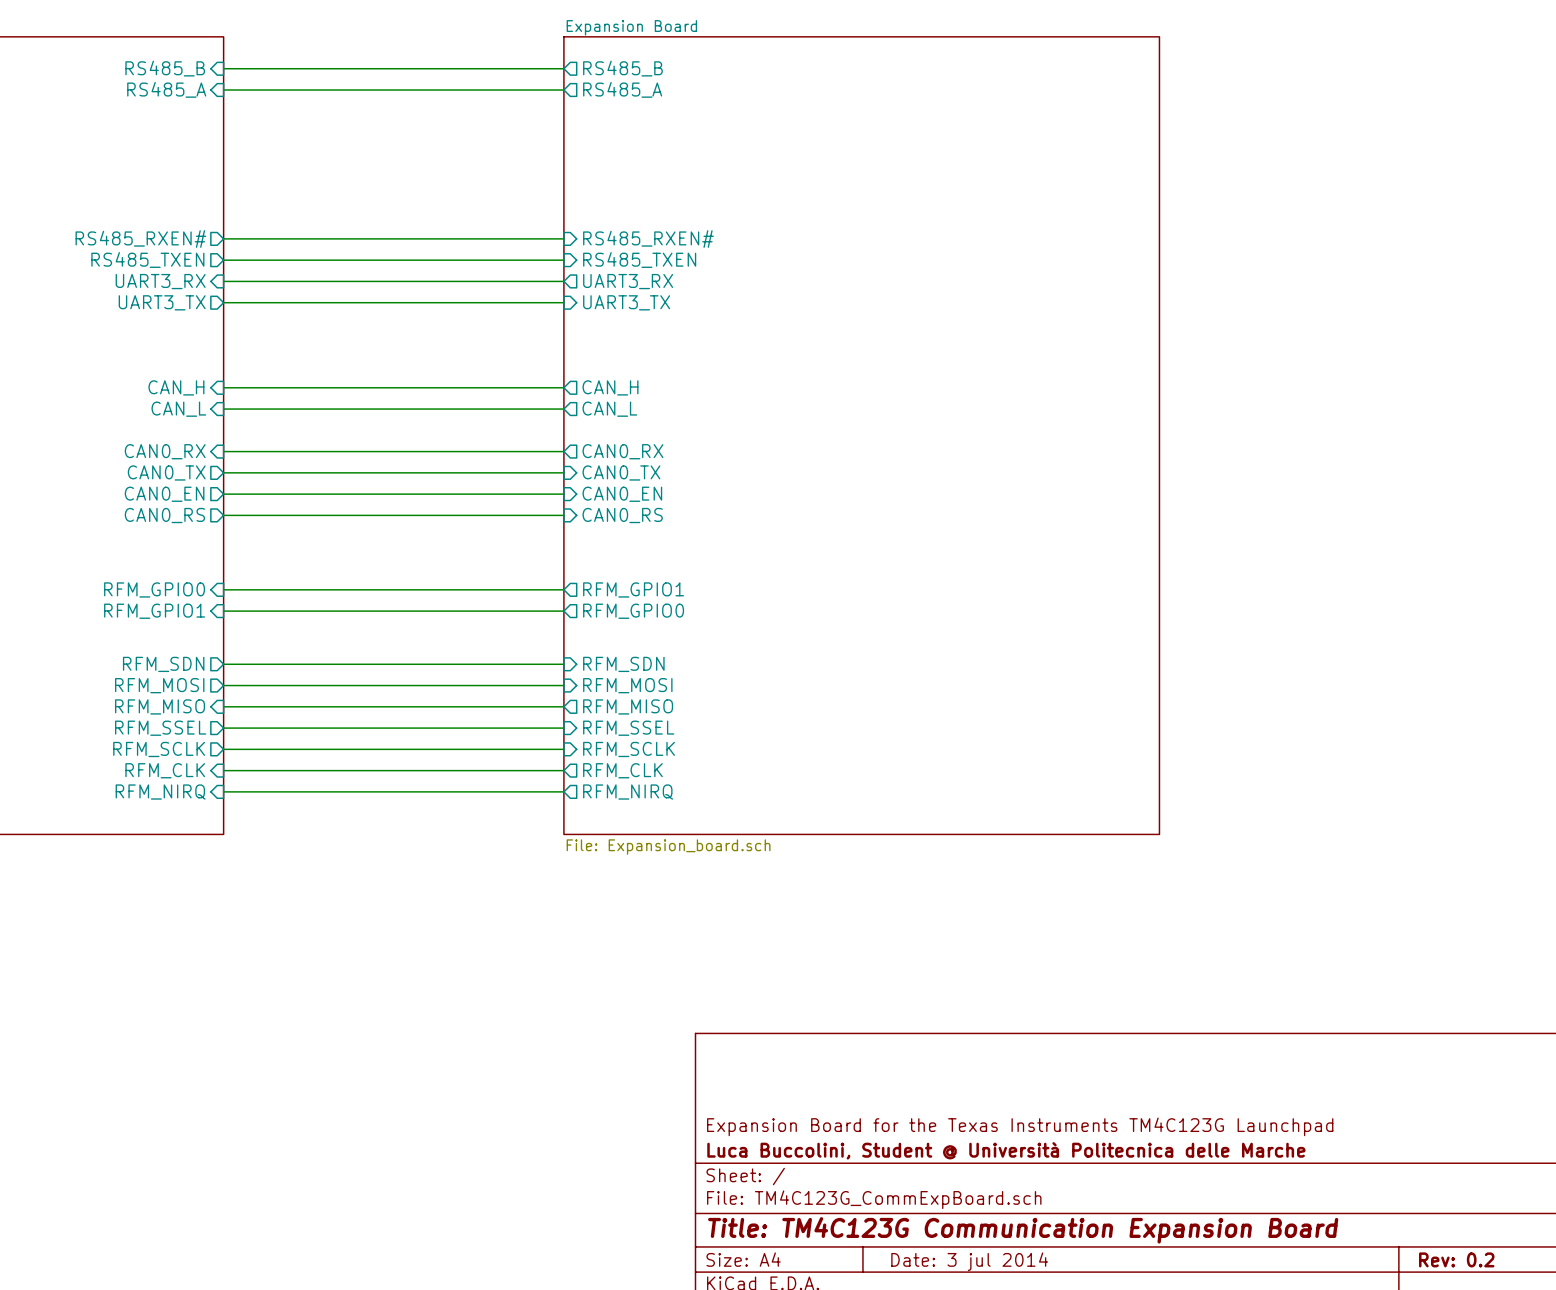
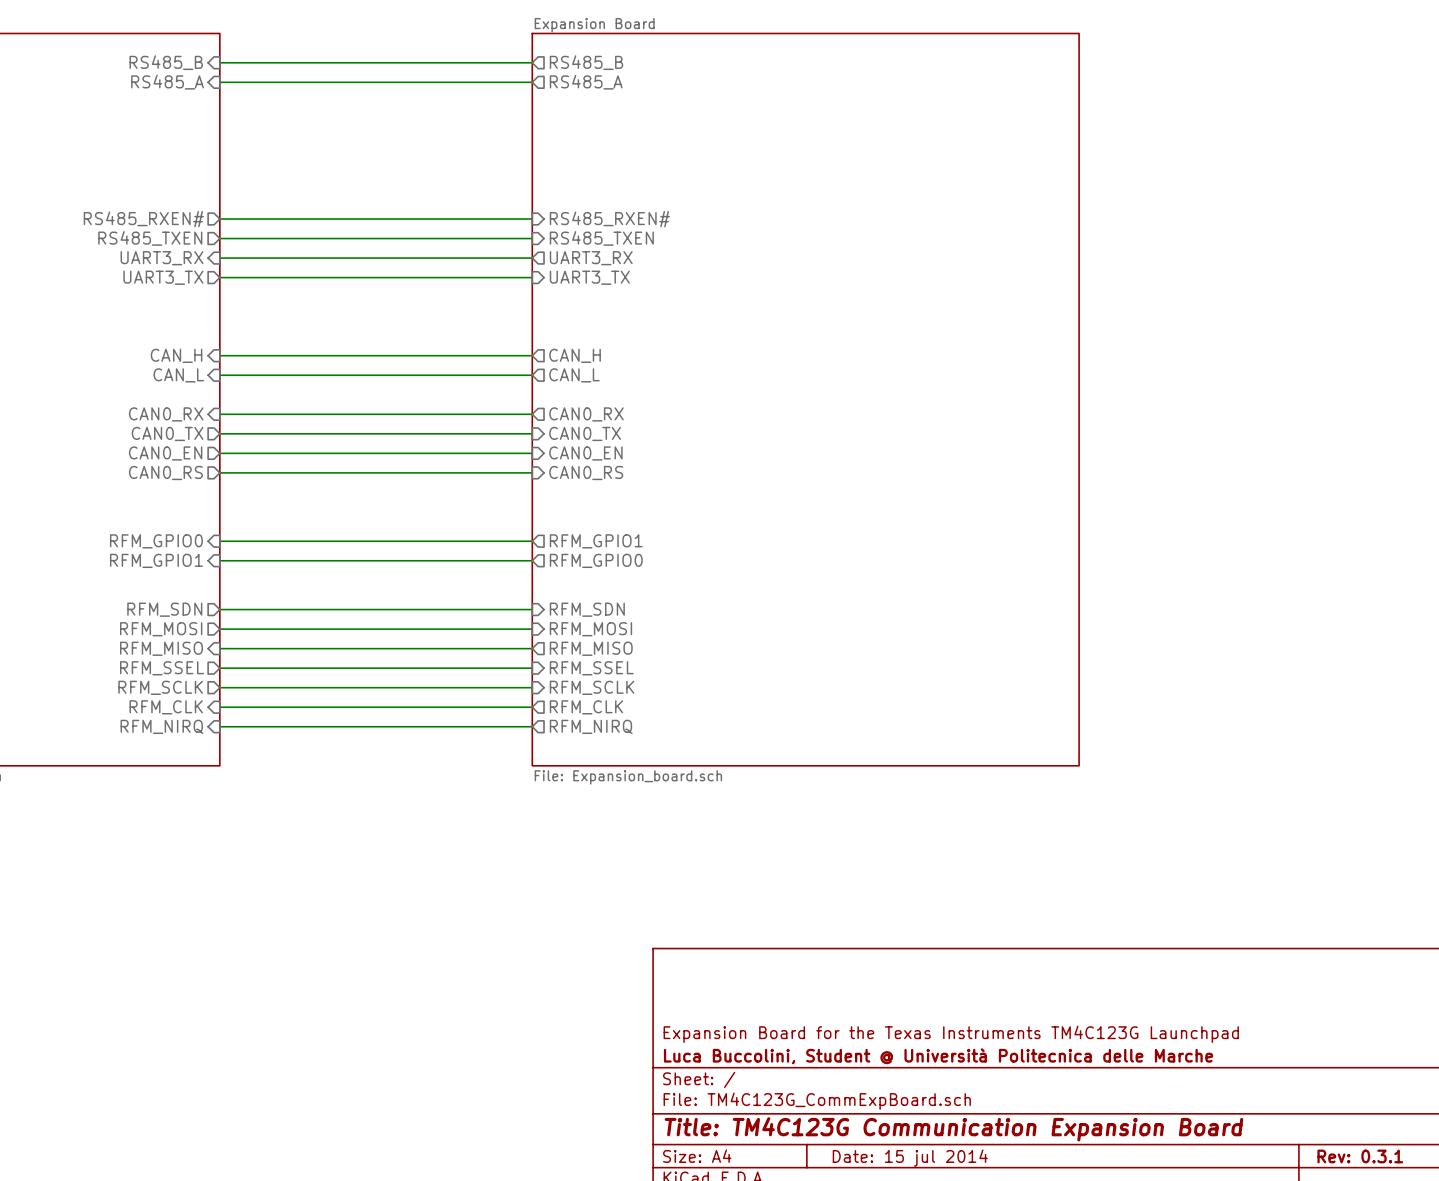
title block: Rev: 0.2 (1456, 1259) -> Rev: 0.3.1 (1360, 1156)
title block: Date: 3 jul 2014 (969, 1261) -> Date: 15 jul 2014 (910, 1158)

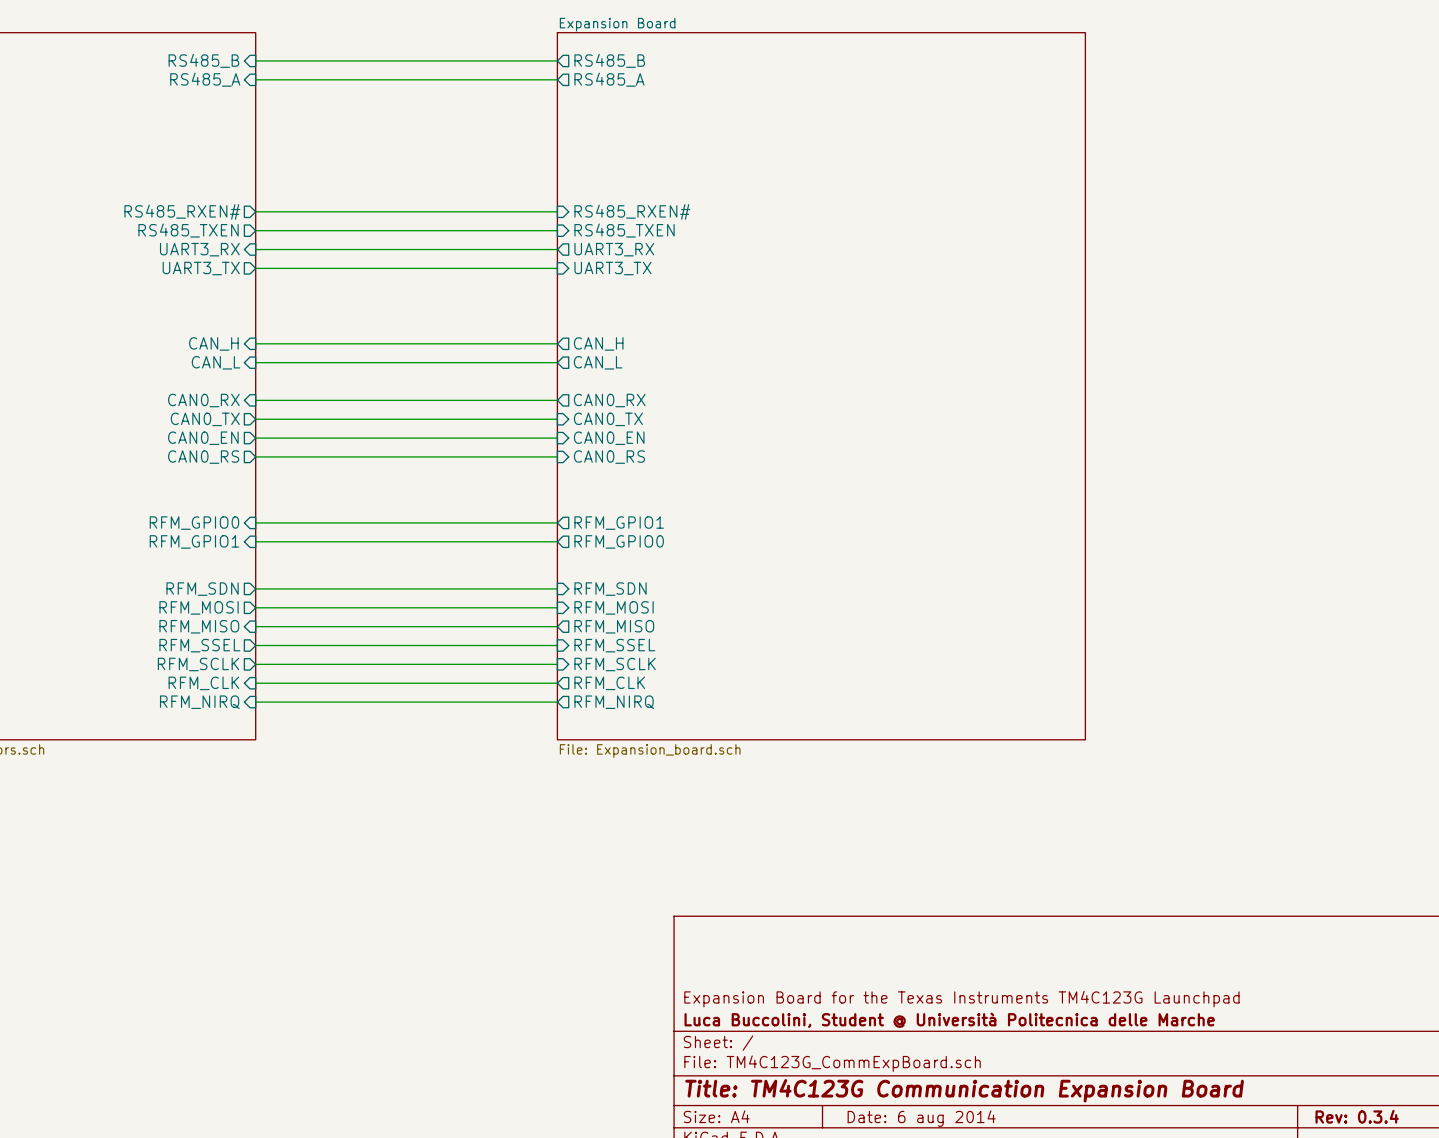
title block: Rev: 0.3.1 (1360, 1156) -> Rev: 0.3.4 (1357, 1116)
title block: Date: 15 jul 2014 (910, 1158) -> Date: 6 aug 2014 (921, 1118)

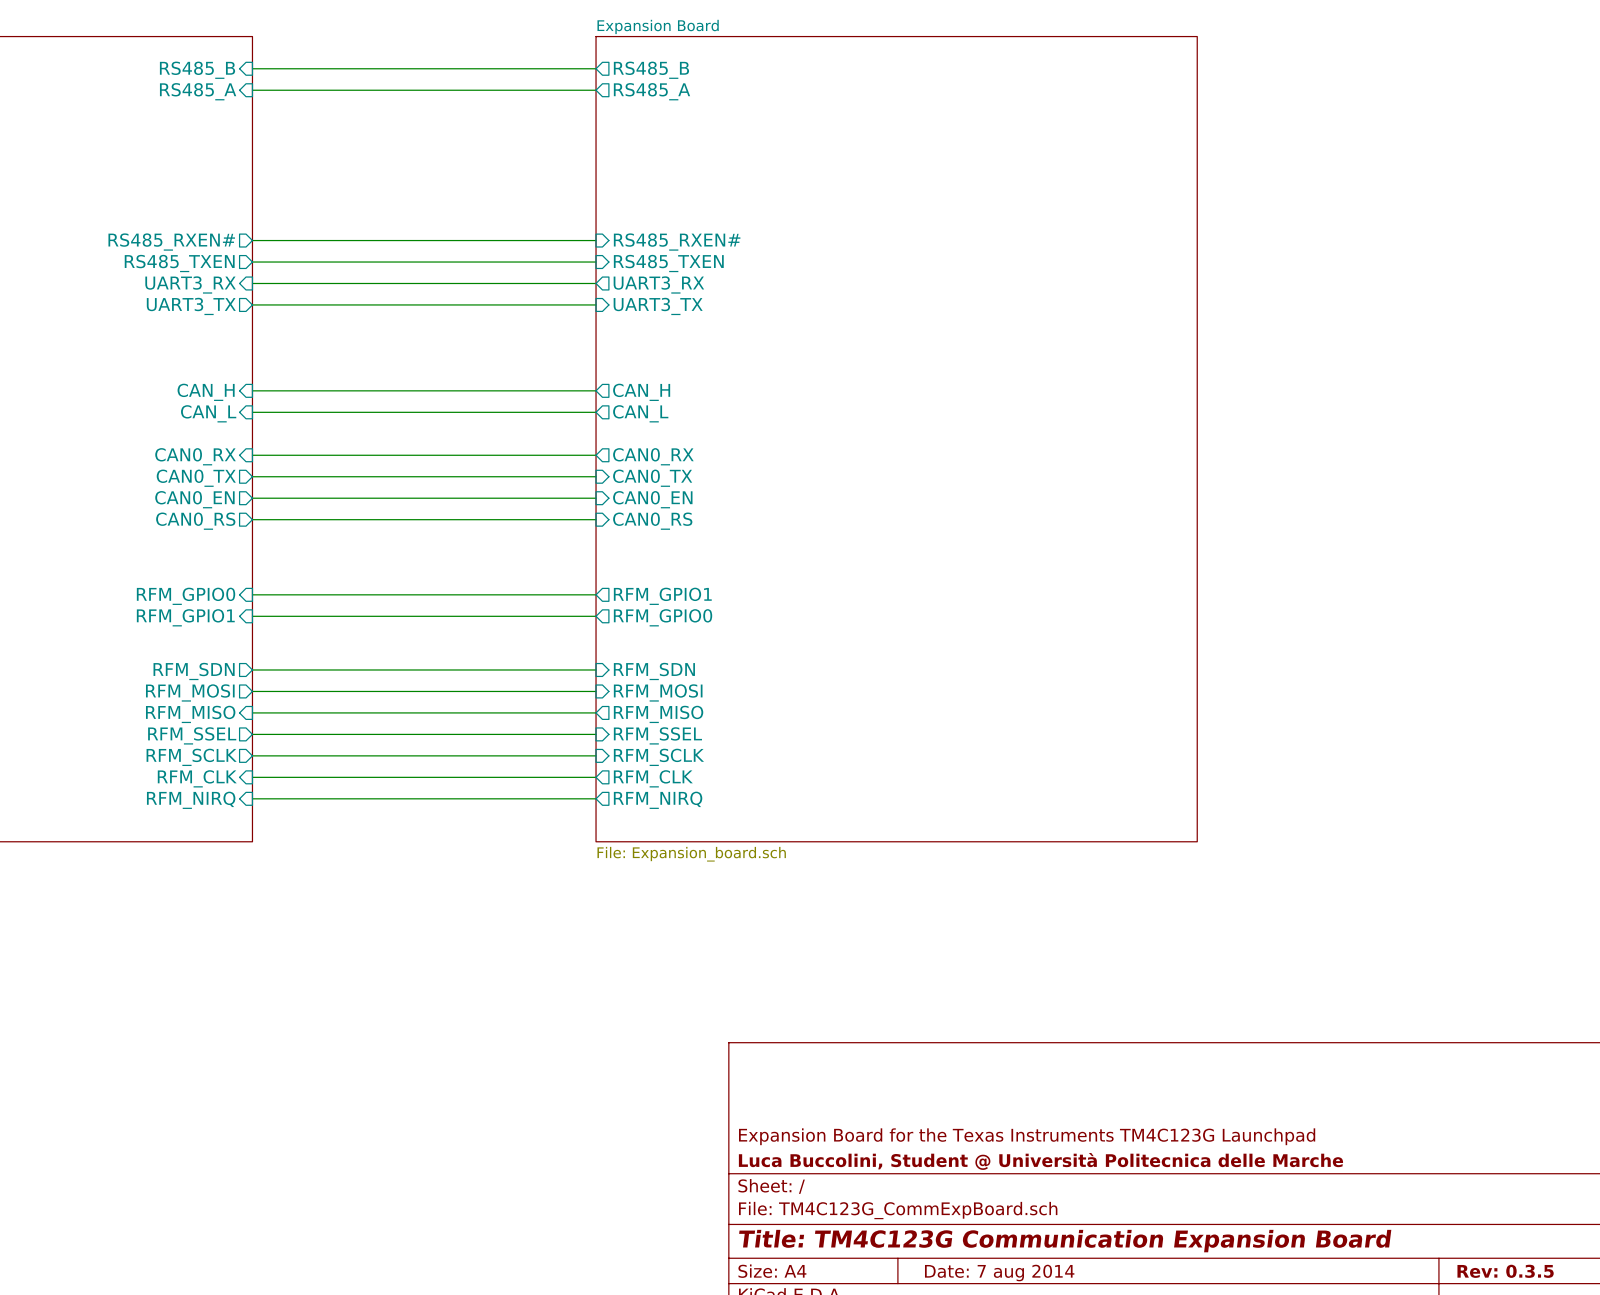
title block: Rev: 0.3.4 (1357, 1116) -> Rev: 0.3.5 (1505, 1271)
title block: Date: 6 aug 2014 (921, 1118) -> Date: 7 aug 2014 (999, 1273)

